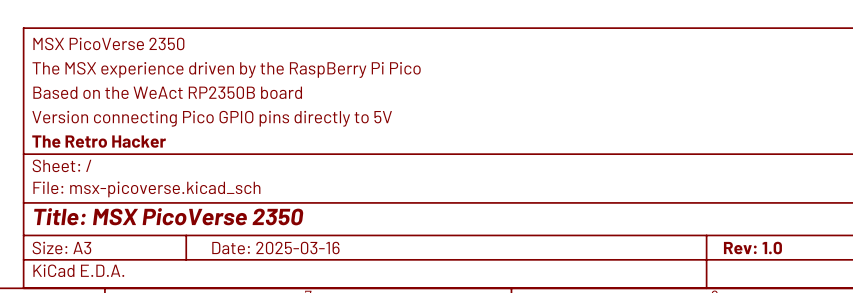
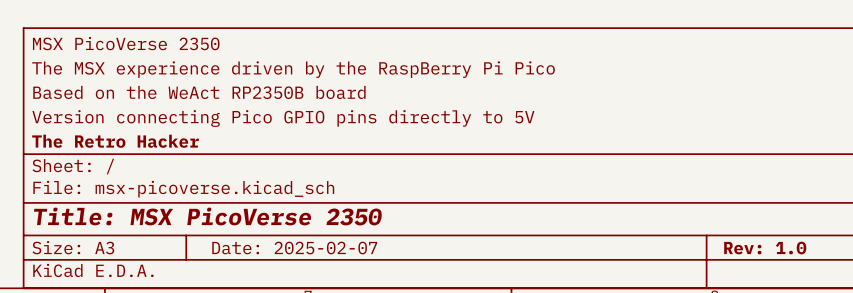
title block: Date: 2025-03-16 (275, 248) -> Date: 2025-02-07 (294, 248)

